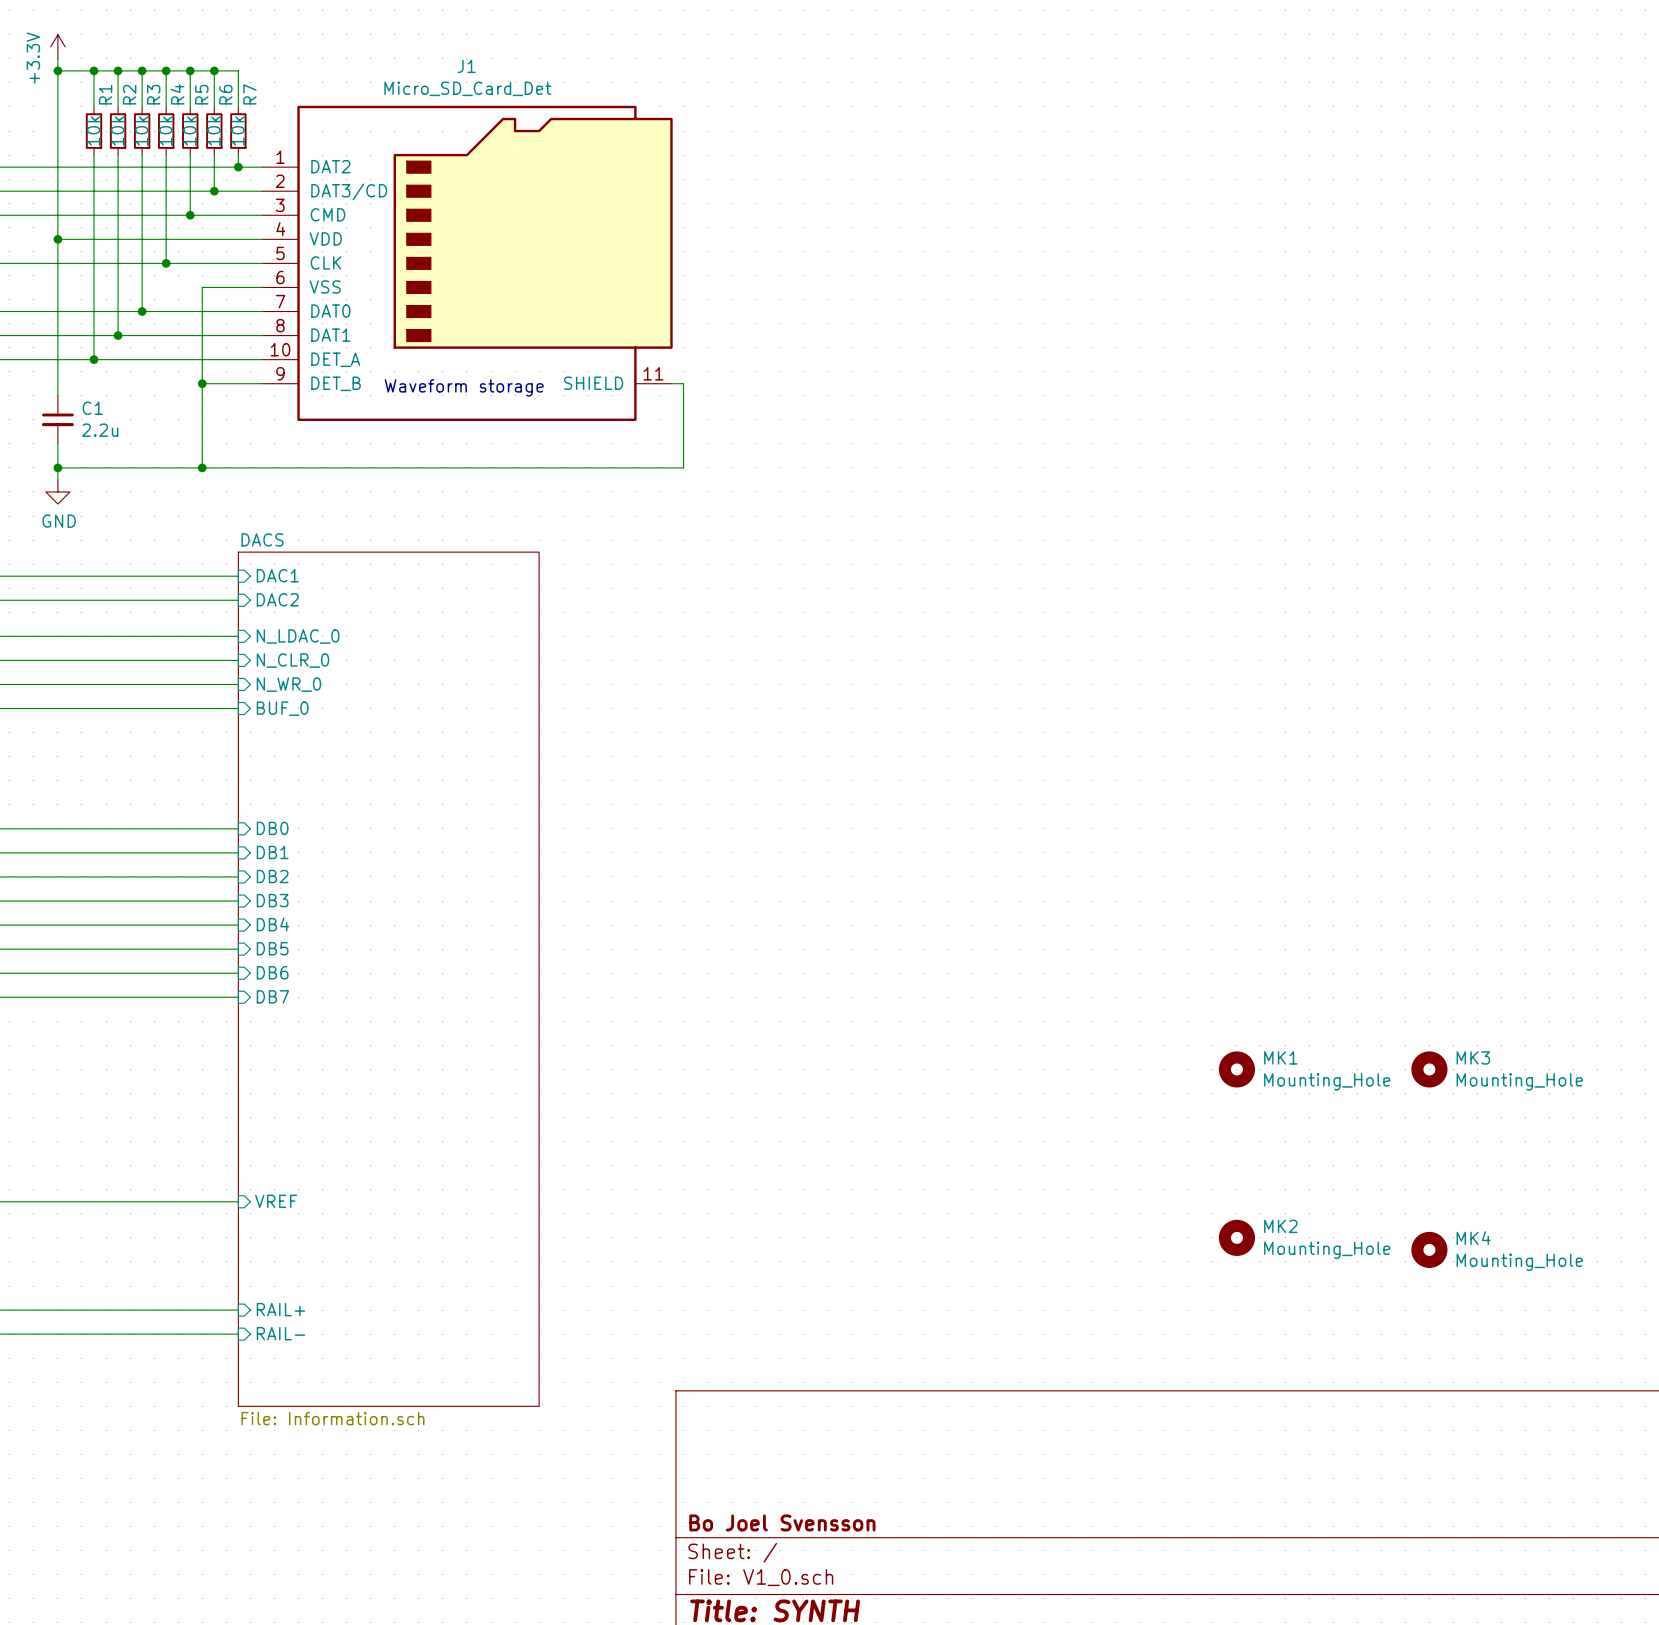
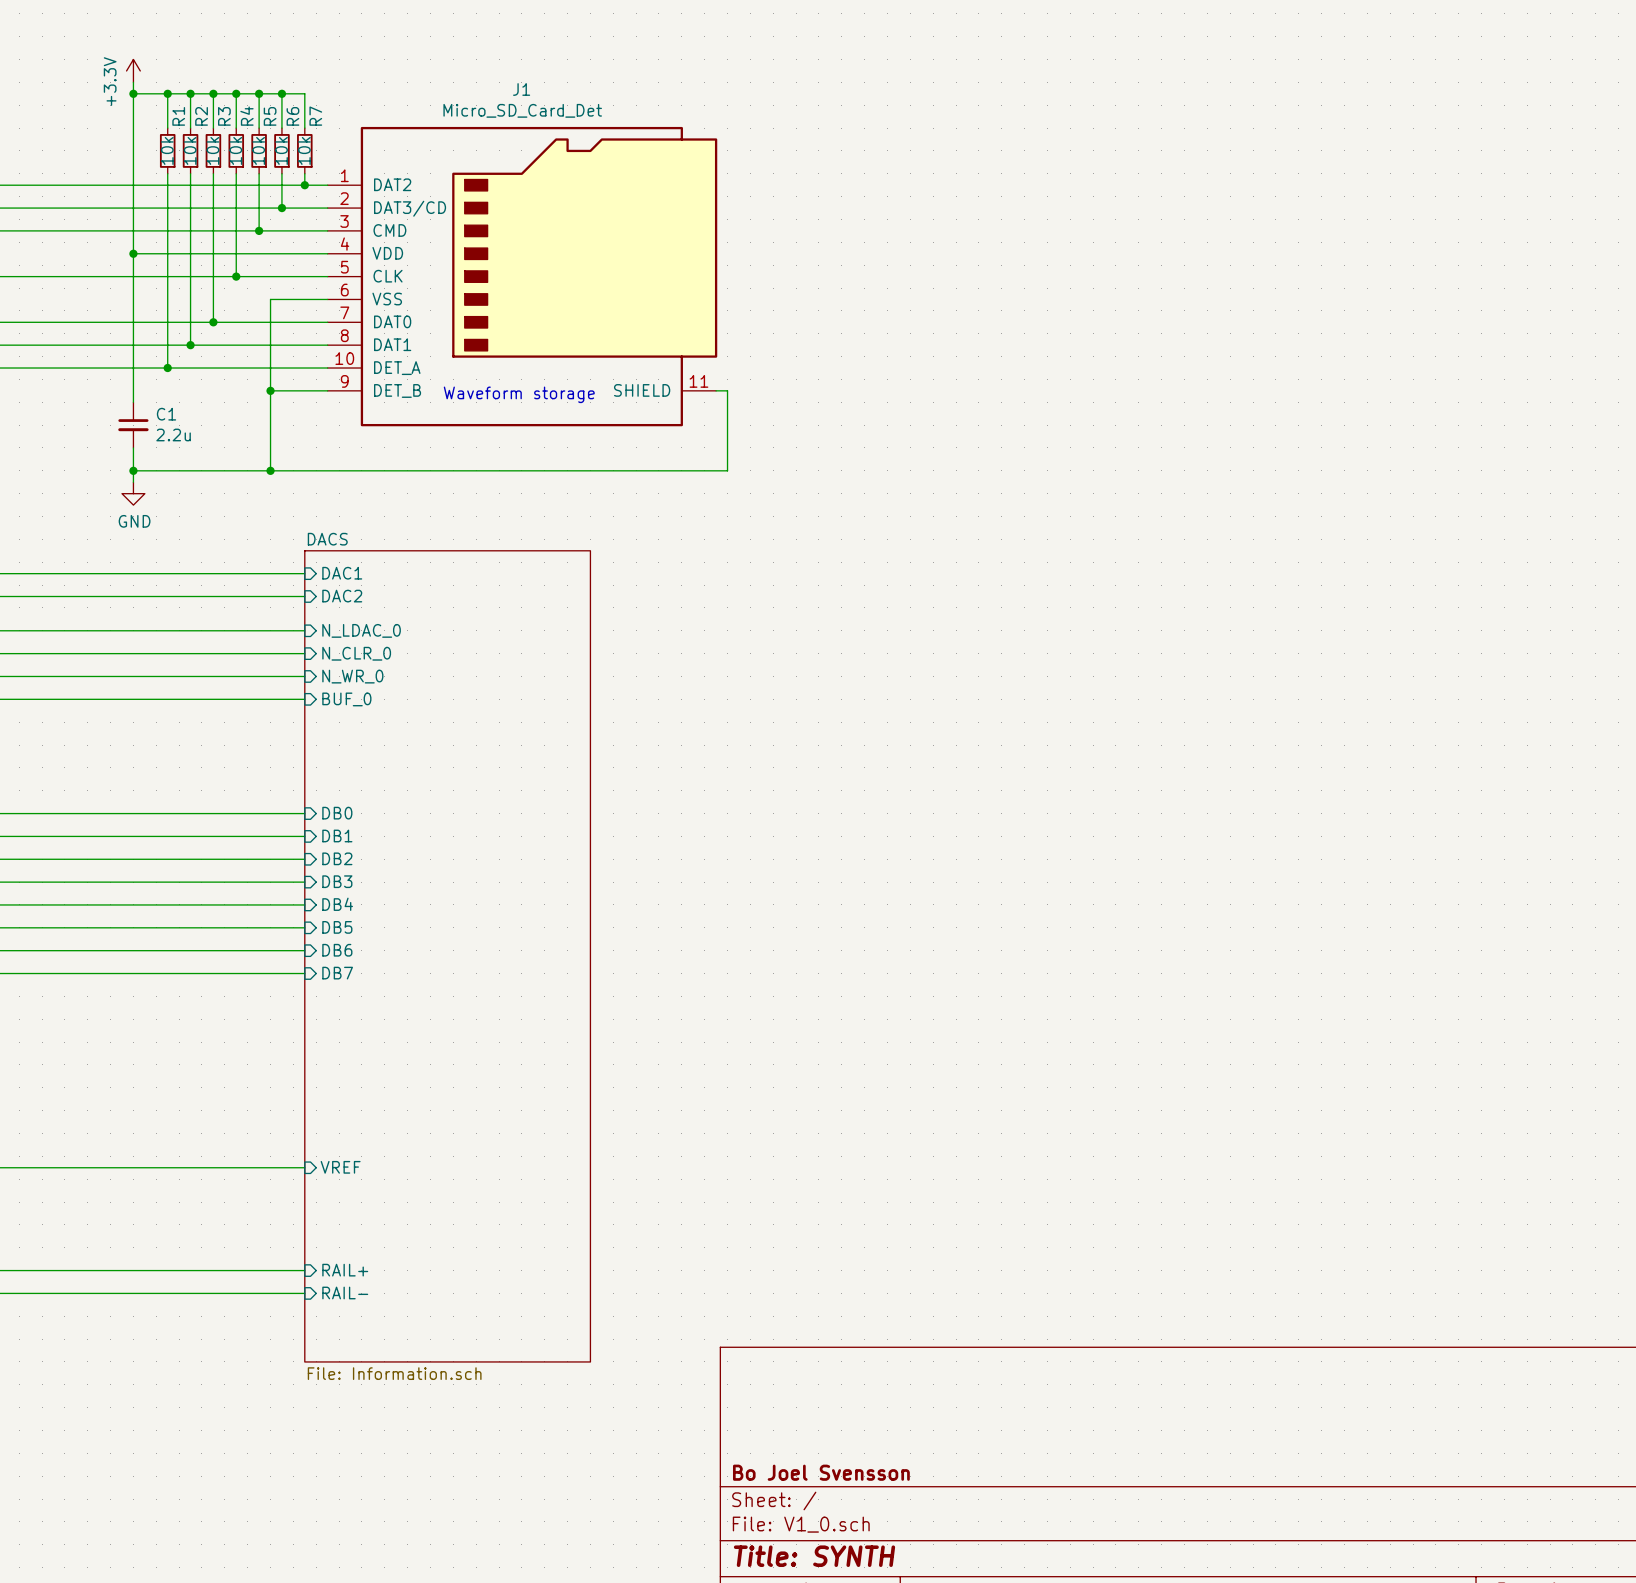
MK1: Mounting_Hole (1236, 1069) -> none
MK3: Mounting_Hole (1429, 1069) -> none
MK2: Mounting_Hole (1236, 1237) -> none
MK4: Mounting_Hole (1429, 1249) -> none

